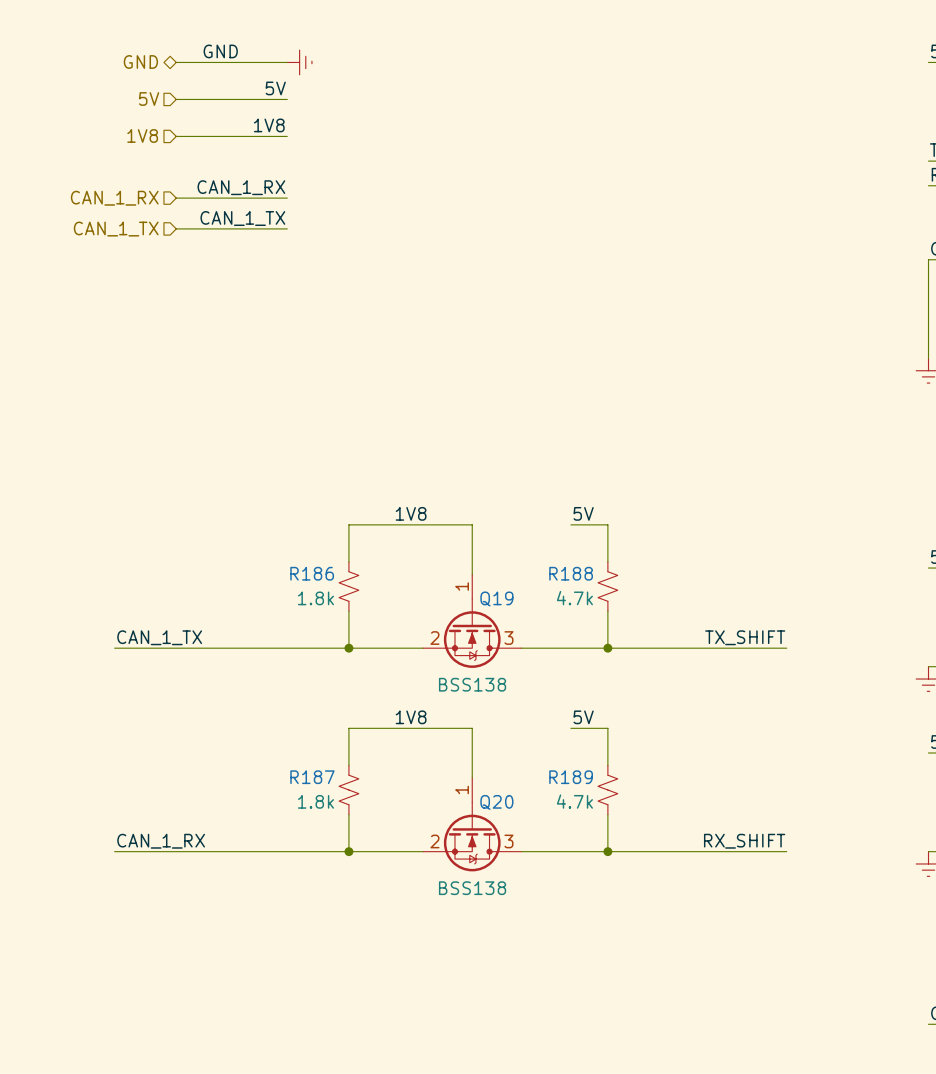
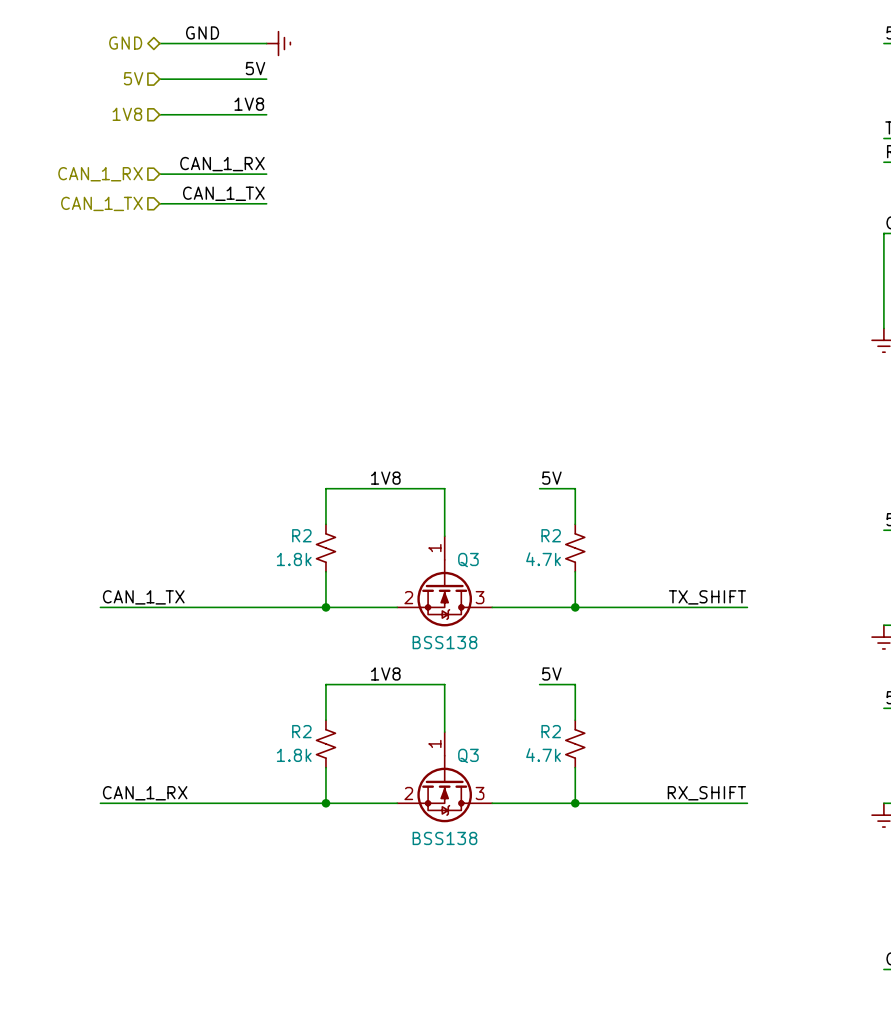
R186 name: R186 (312, 573) -> R2 (301, 535)
R188 name: R188 (571, 573) -> R2 (551, 535)
Q19 name: Q19 (496, 598) -> Q3 (468, 560)
R187 name: R187 (312, 777) -> R2 (301, 731)
R189 name: R189 (571, 777) -> R2 (551, 731)
Q20 name: Q20 (496, 802) -> Q3 (468, 755)

